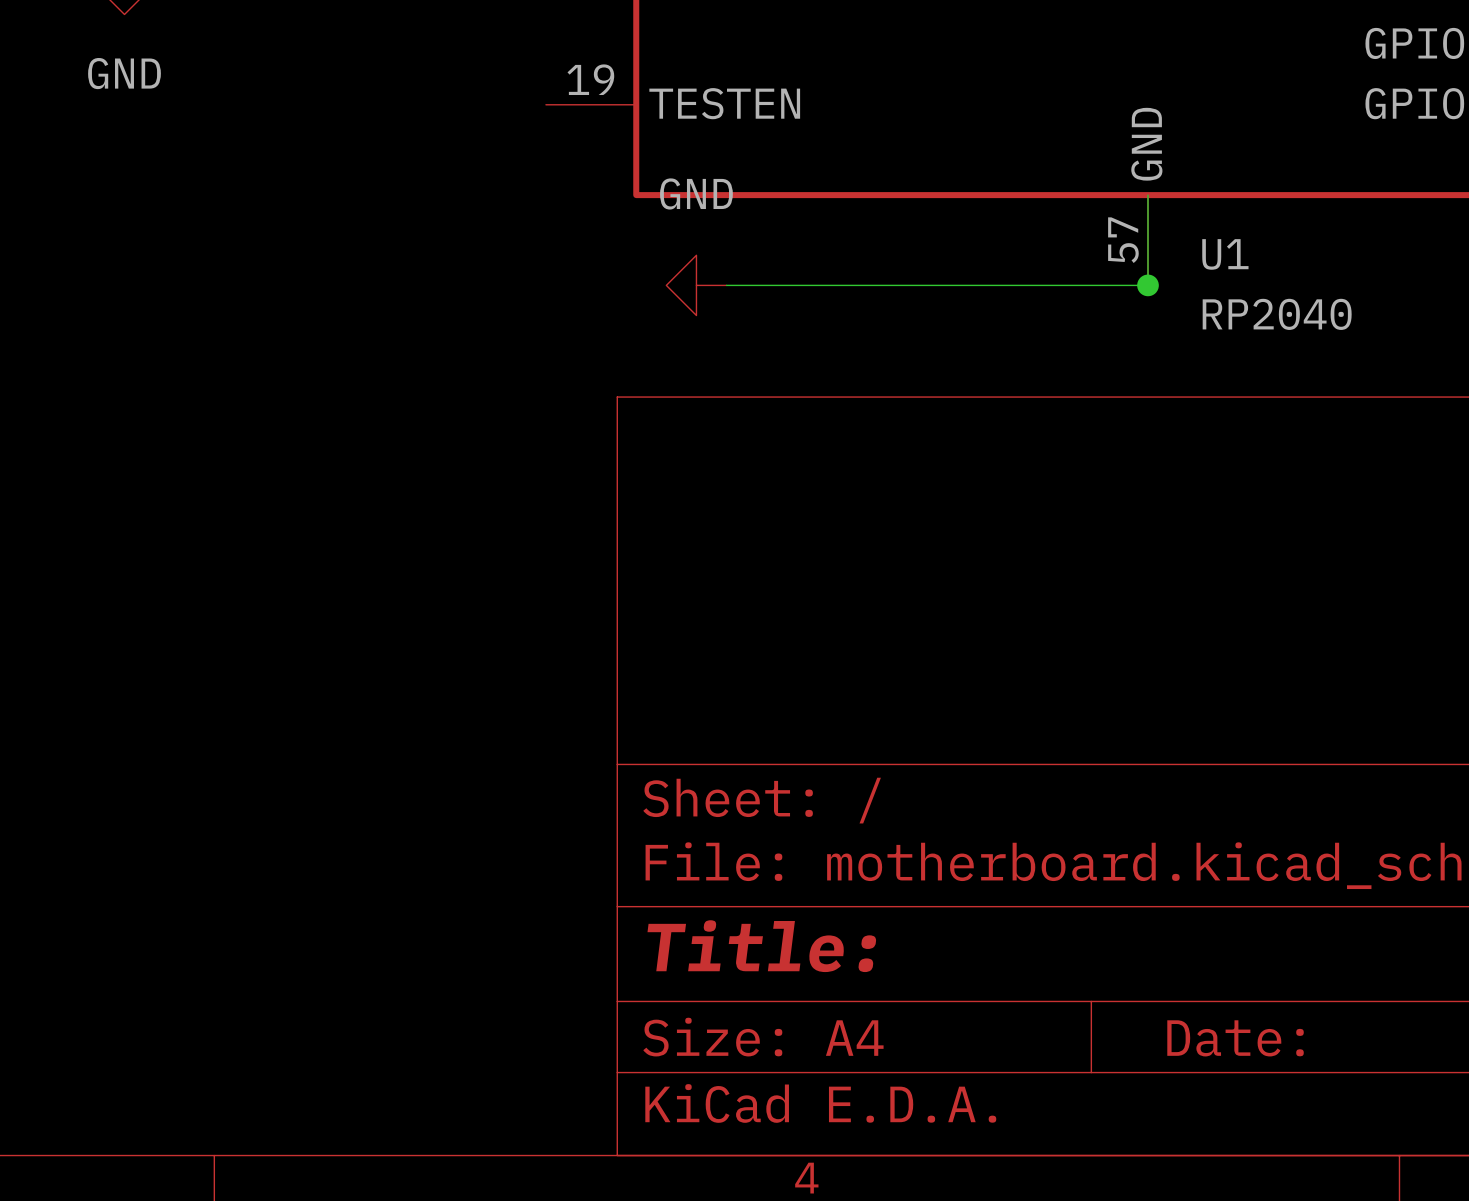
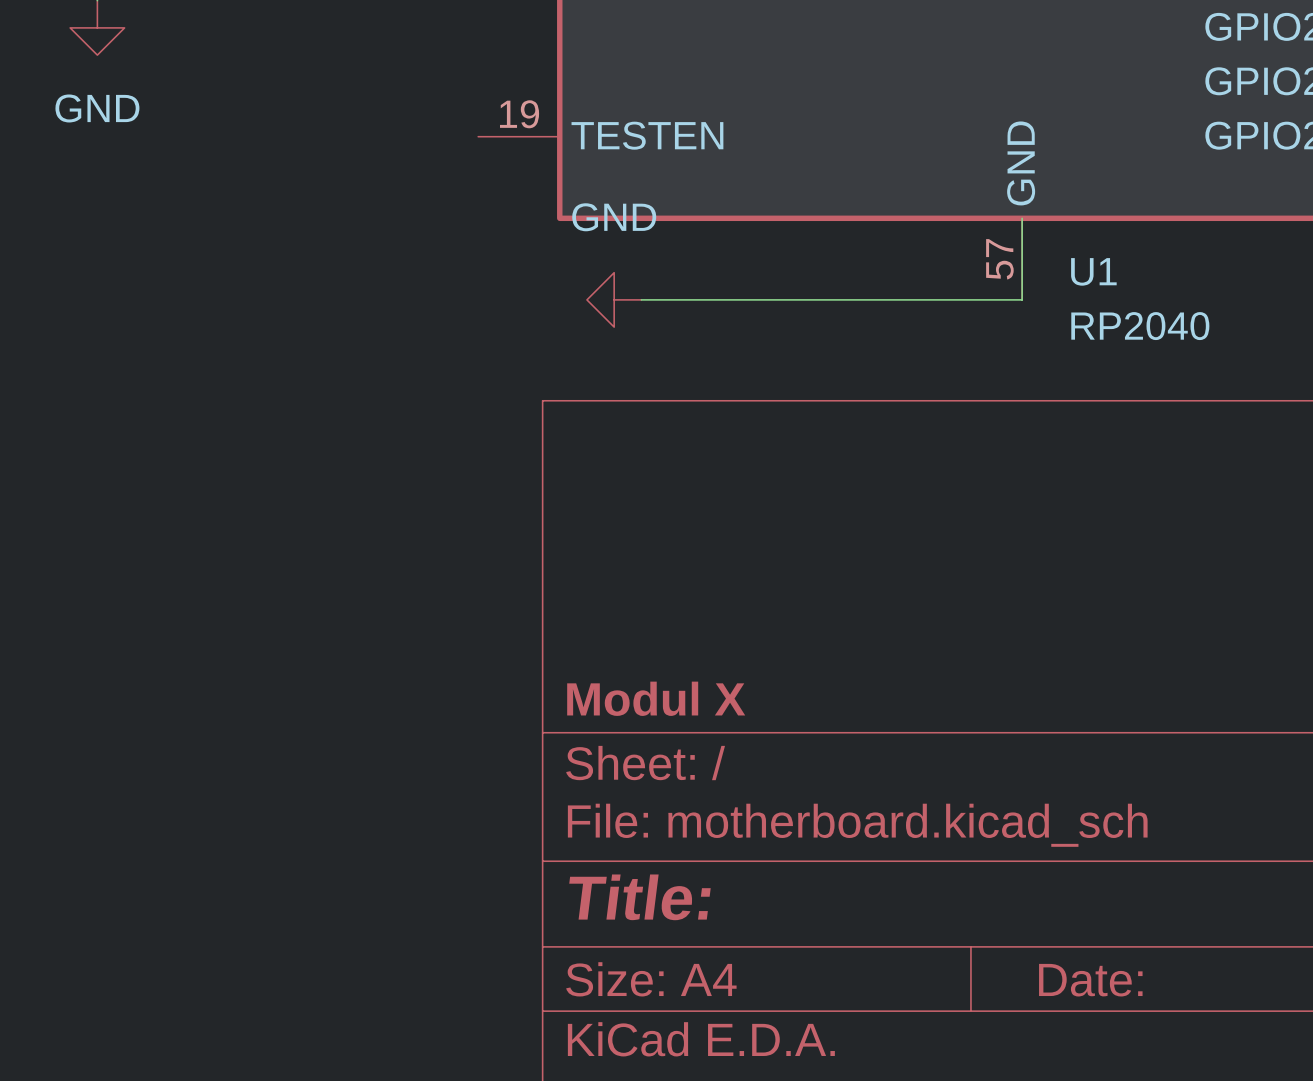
junction: (1147, 285) -> none
title block: none -> Modul X (656, 698)

